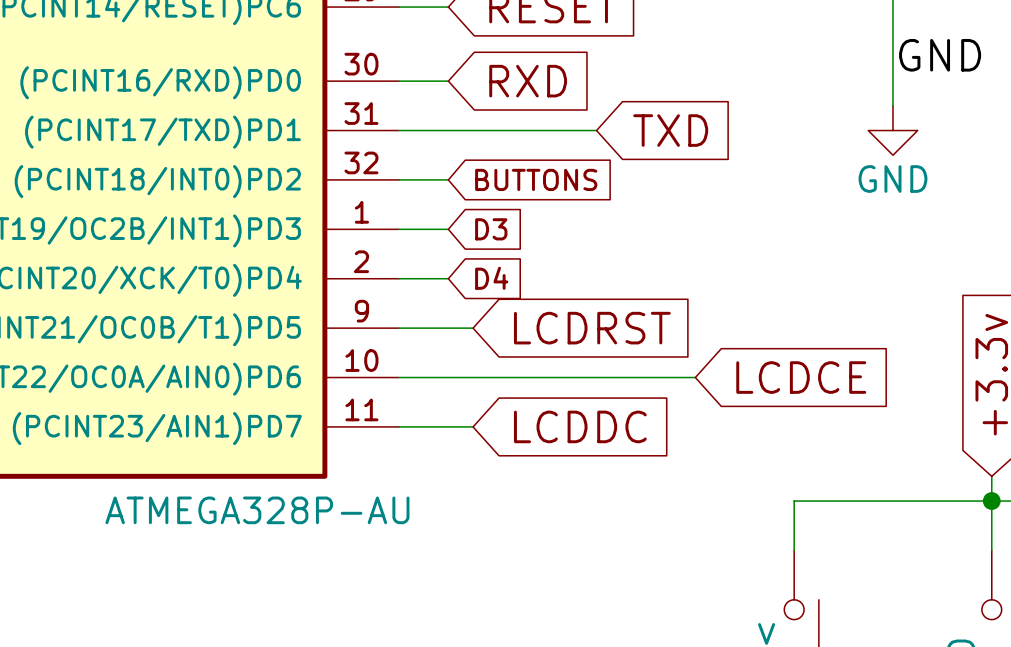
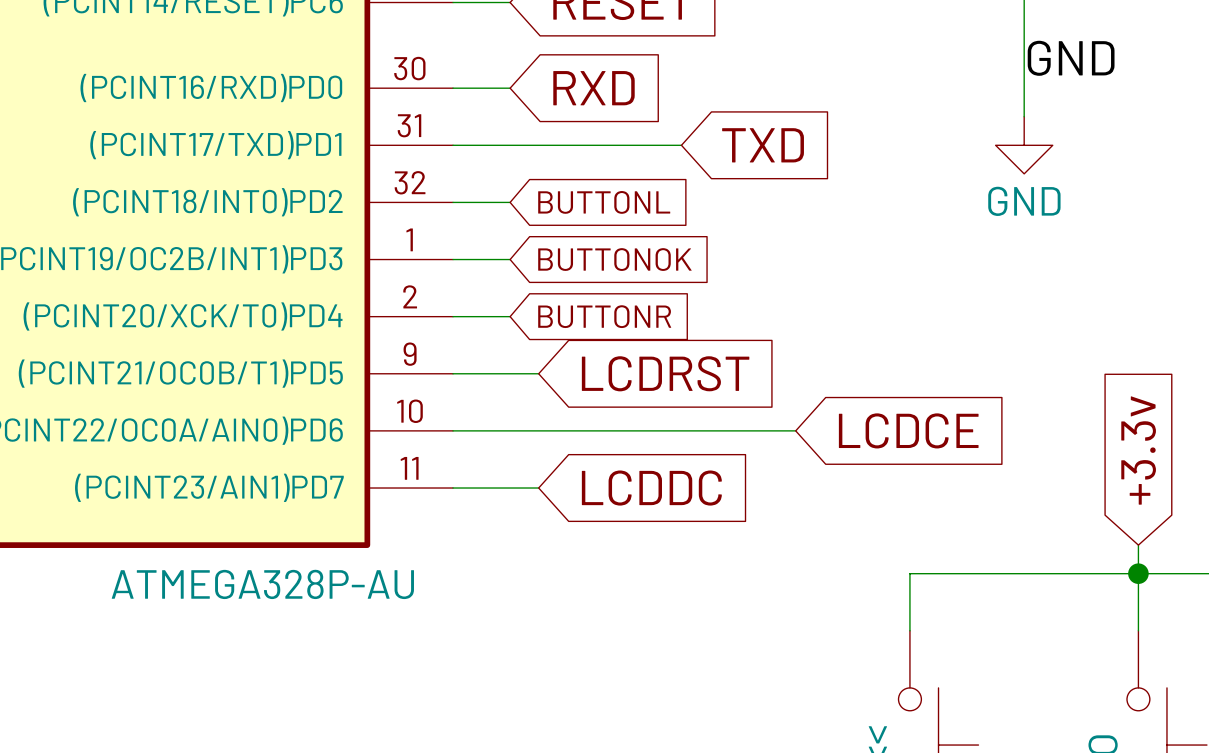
global label: BUTTONS (536, 179) -> BUTTONL (604, 202)
global label: D3 (491, 229) -> BUTTONOK (614, 259)
global label: D4 (491, 278) -> BUTTONR (604, 316)

